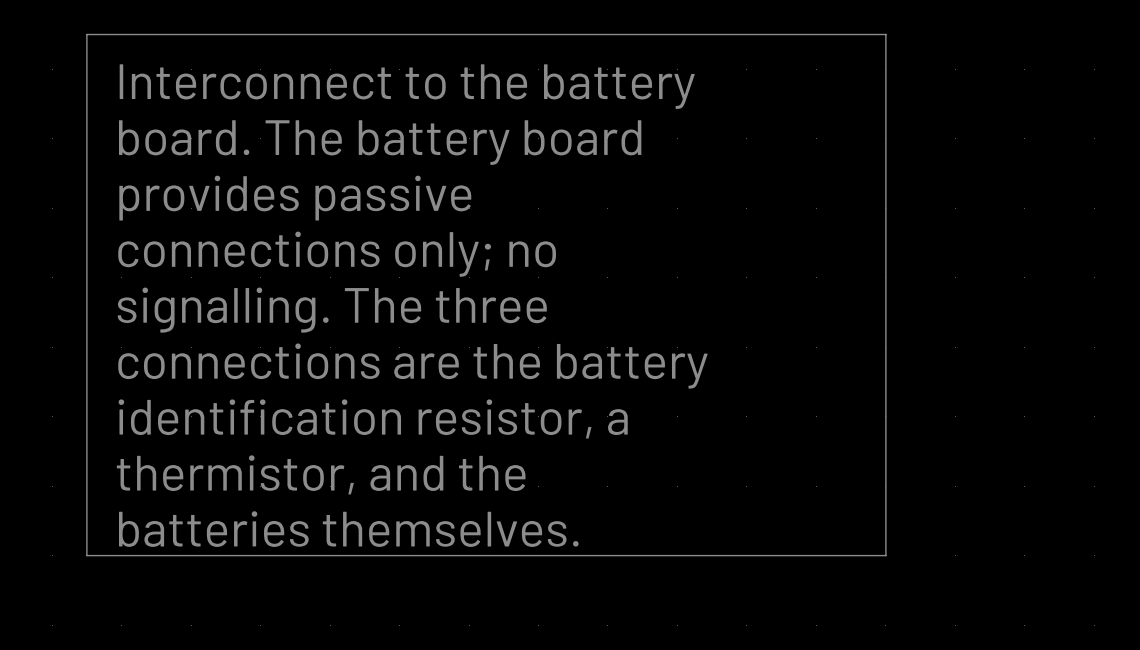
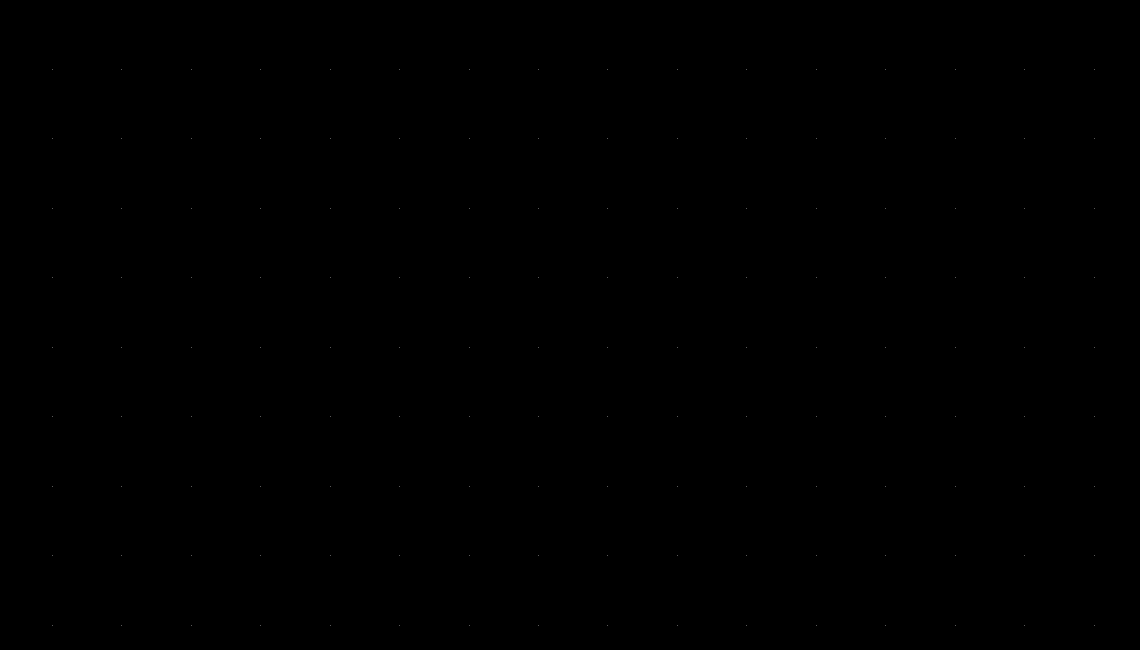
line: (86, 34) (885, 34) (885, 555) (86, 555) (86, 34) -> none
text: Interconnect to the battery (407, 86) -> none
text: board. The battery board (380, 142) -> none
text: provides passive (295, 198) -> none
text: connections only; no (337, 254) -> none
text: signalling. The three (332, 310) -> none
text: connections are the battery (413, 366) -> none
text: identification resistor, a (373, 418) -> none
text: thermistor, and the (321, 474) -> none
text: batteries themselves. (348, 529) -> none

